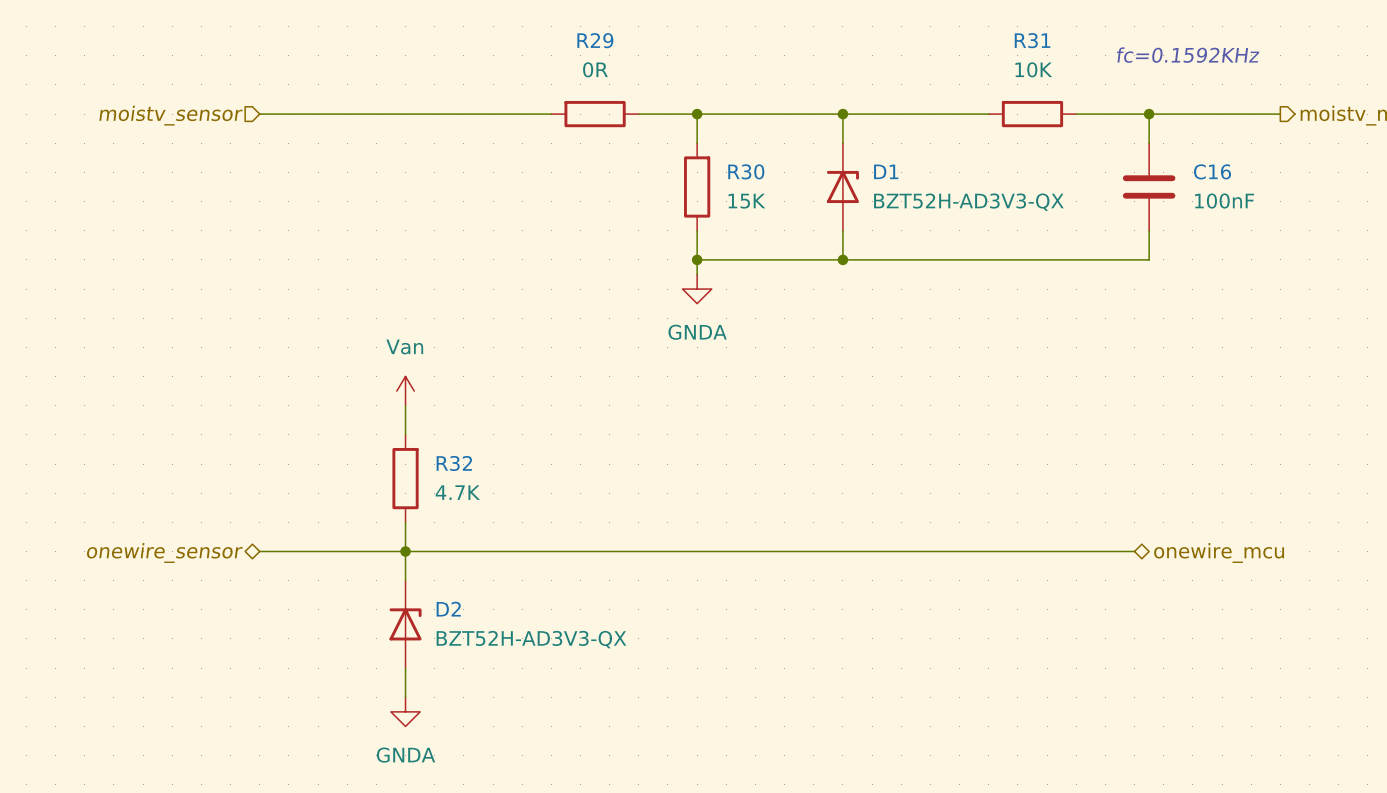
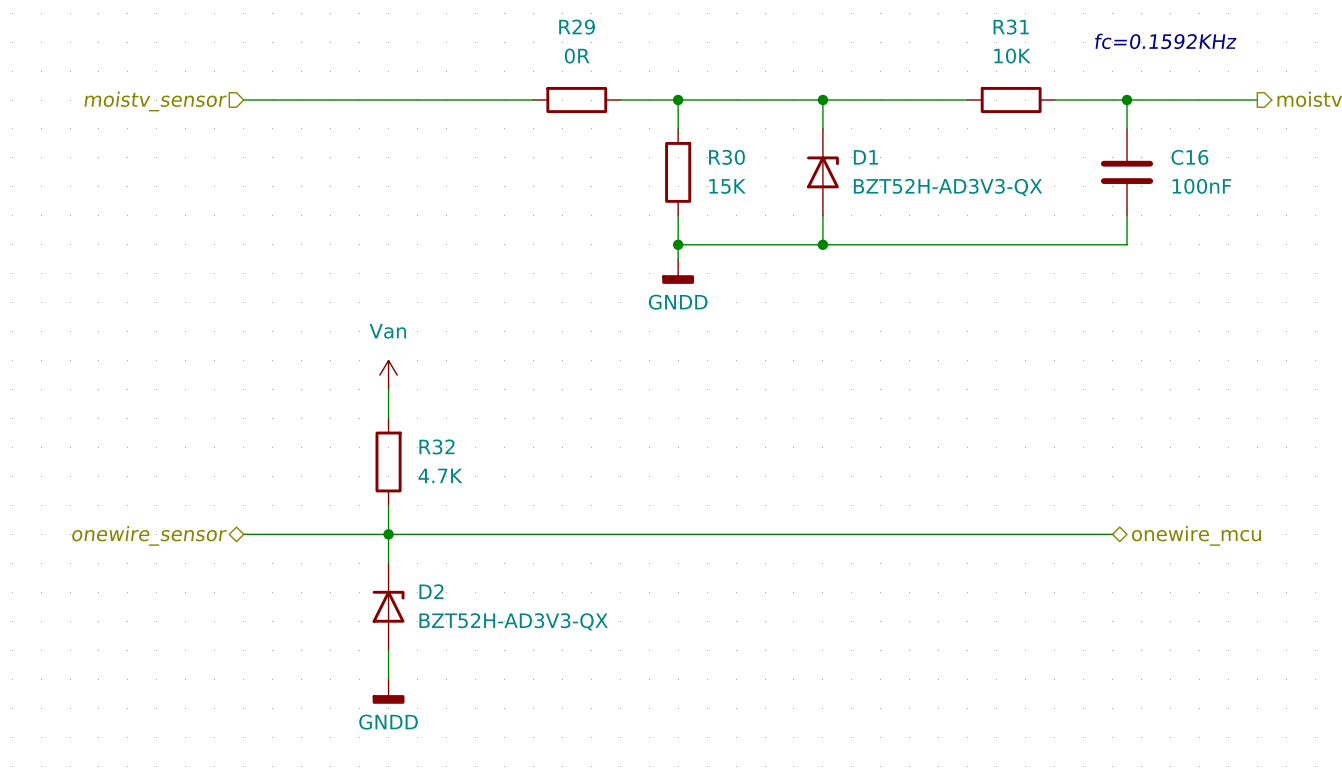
power symbol: GNDA (697, 289) -> GNDD (678, 271)
power symbol: GNDA (405, 711) -> GNDD (388, 691)

